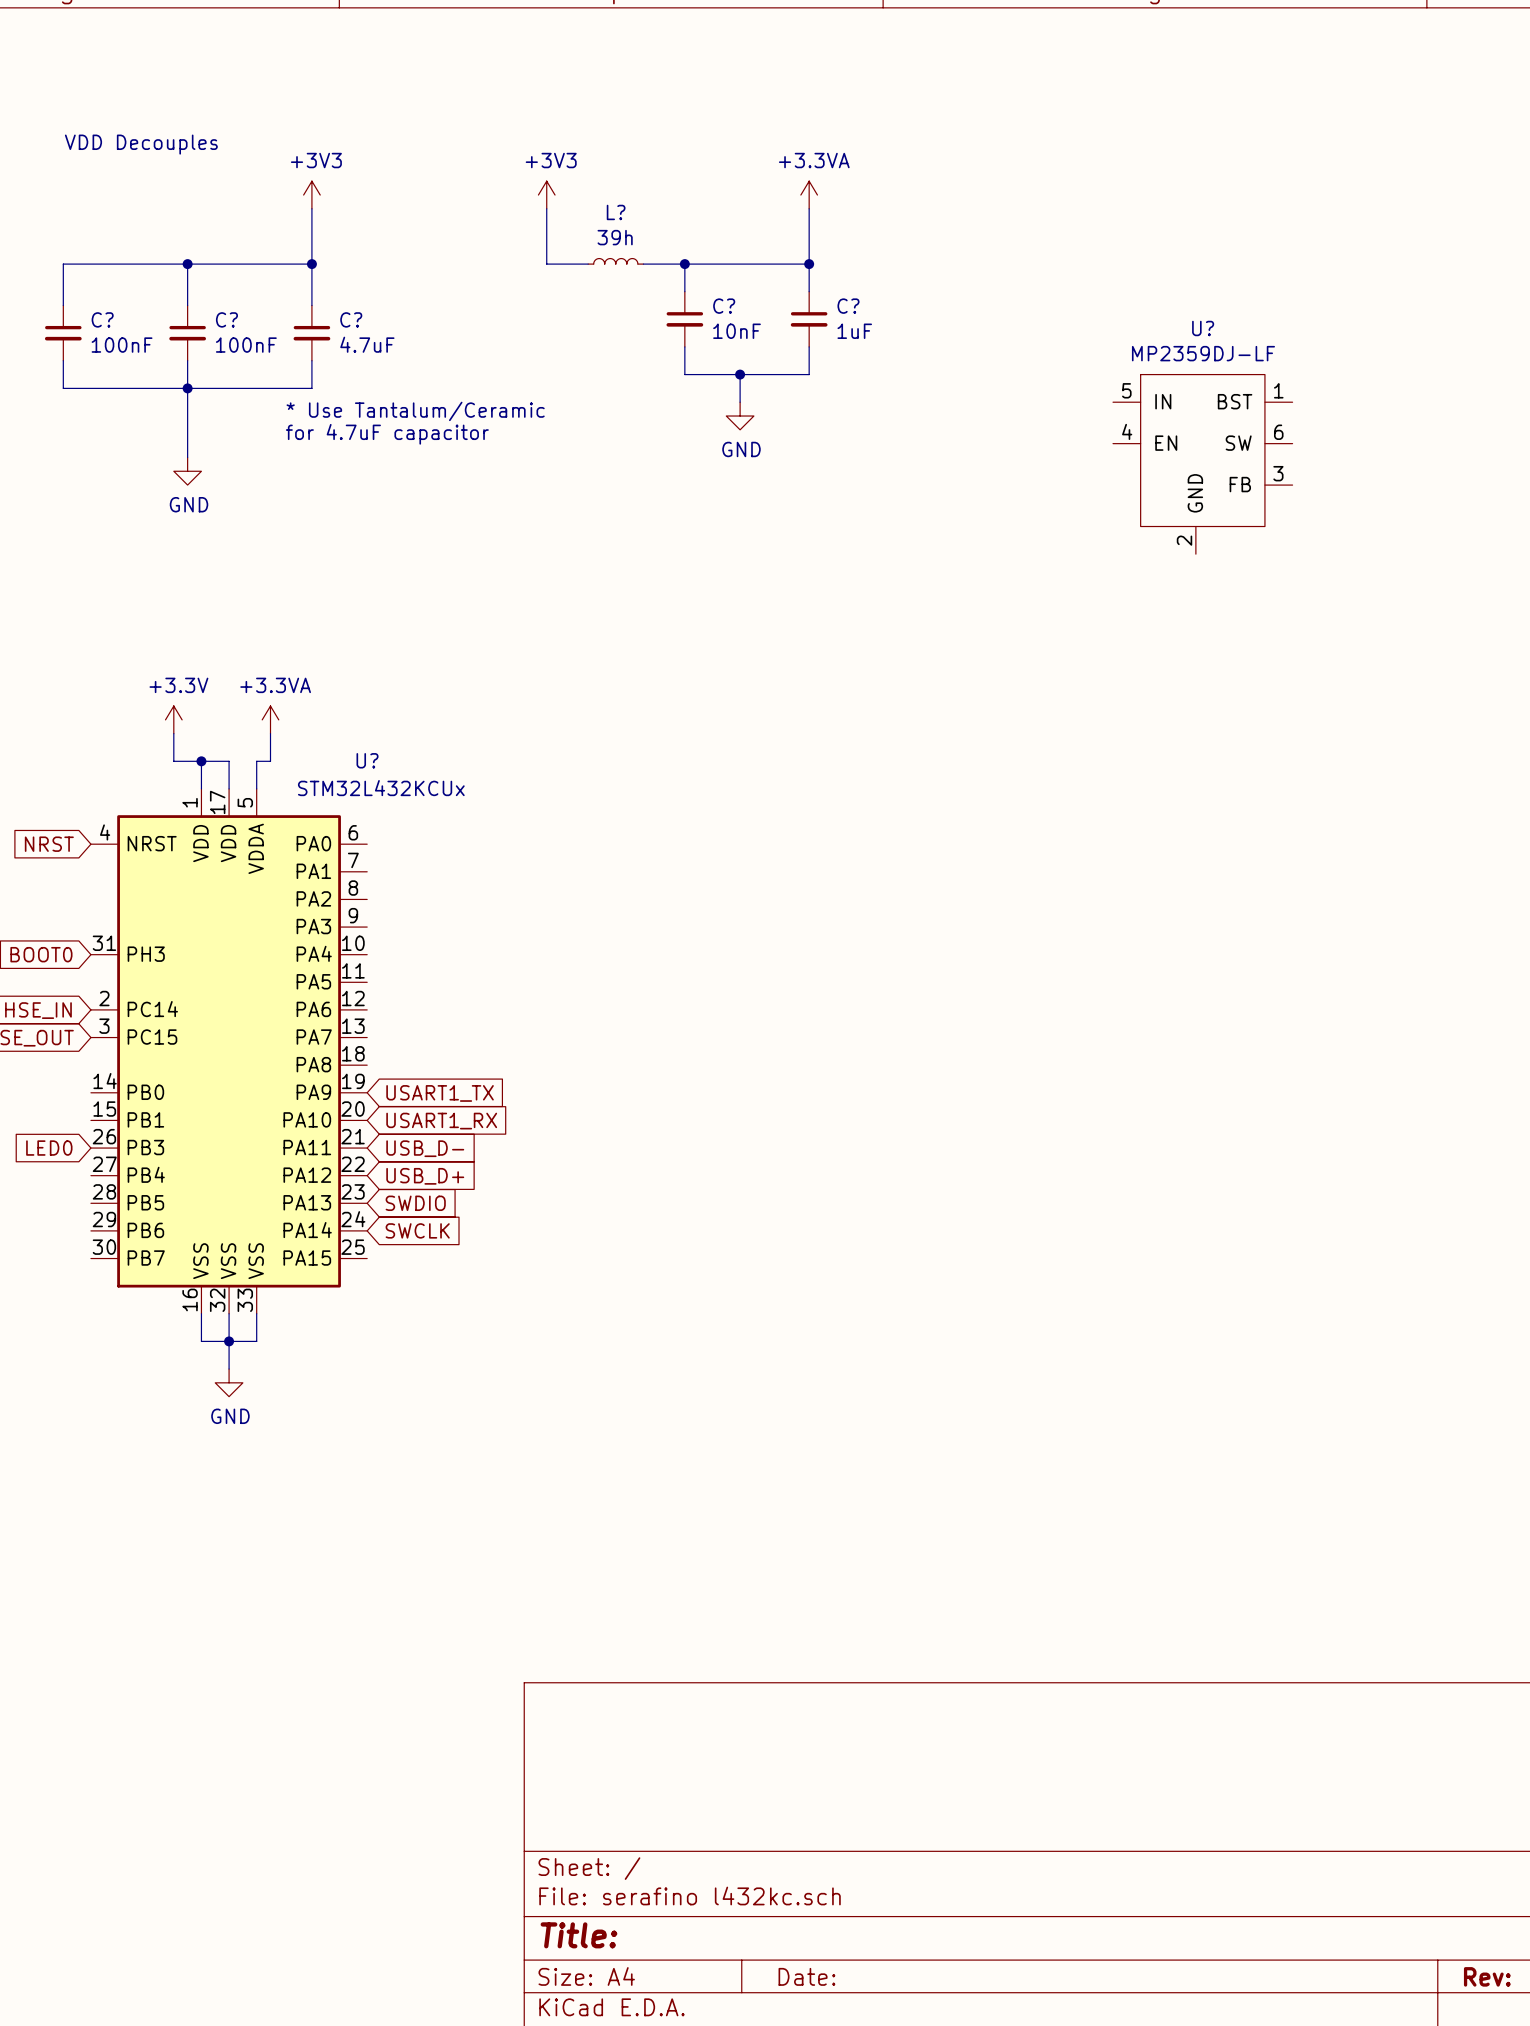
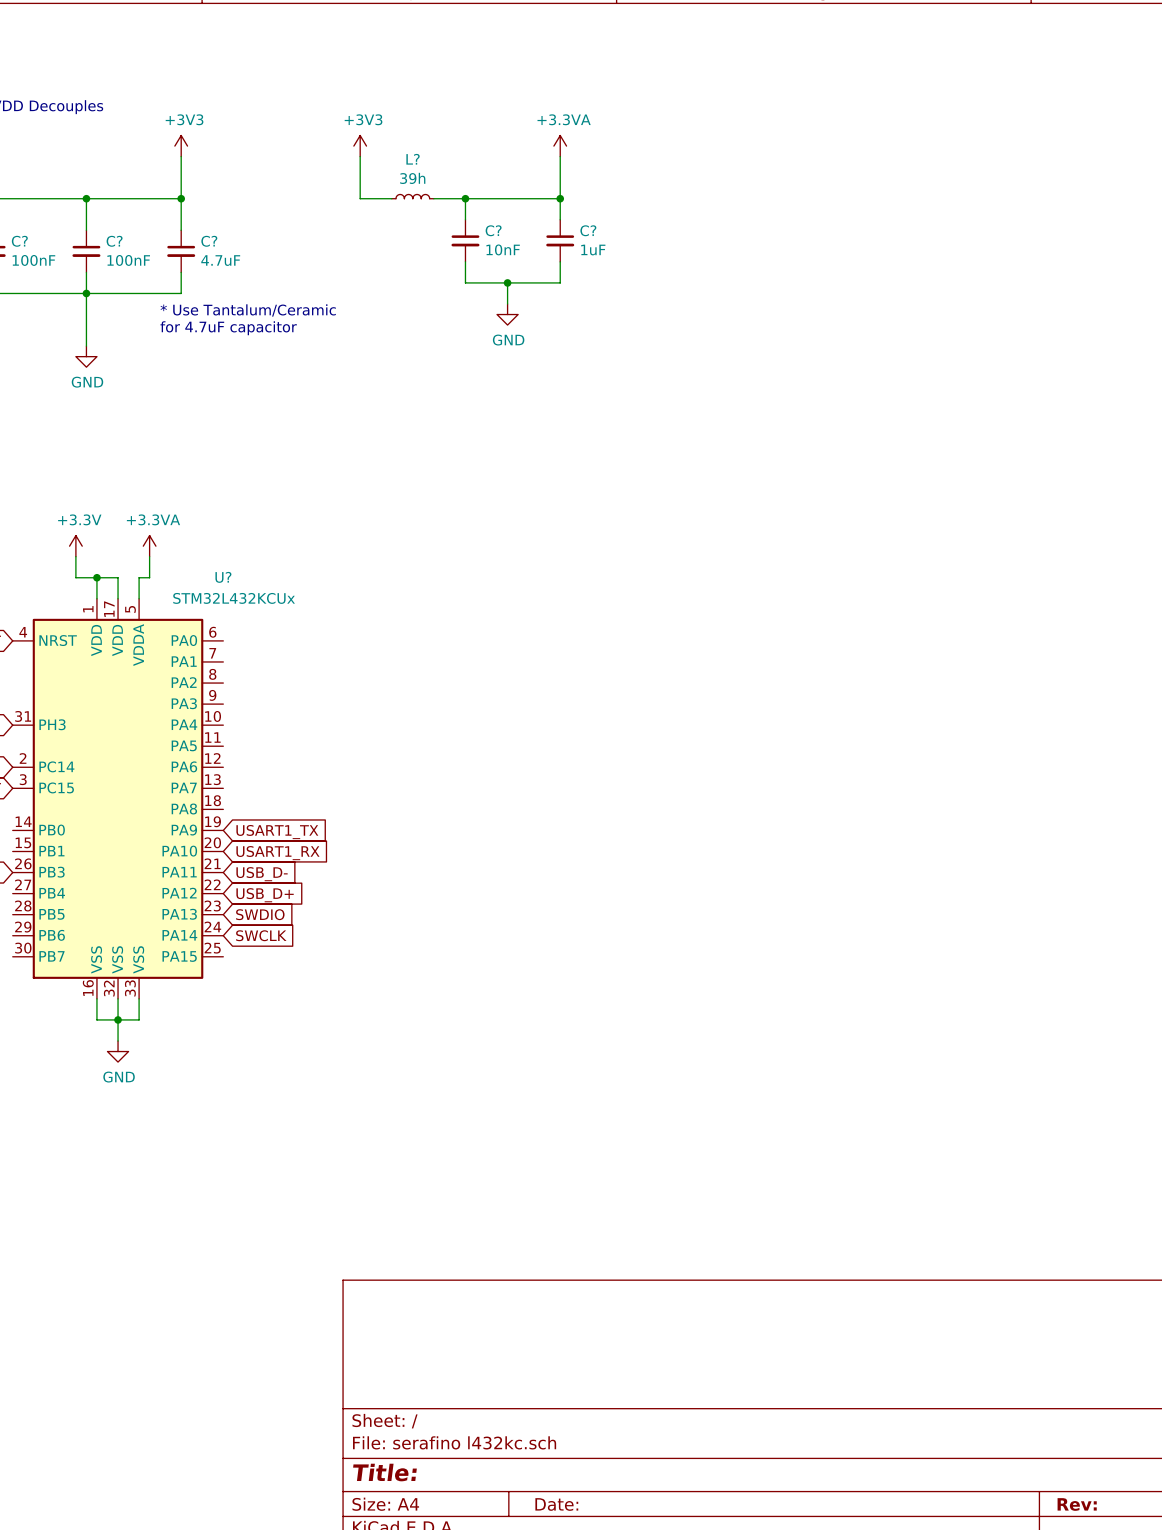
U?: MP2359DJ-LF (1202, 464) -> none

